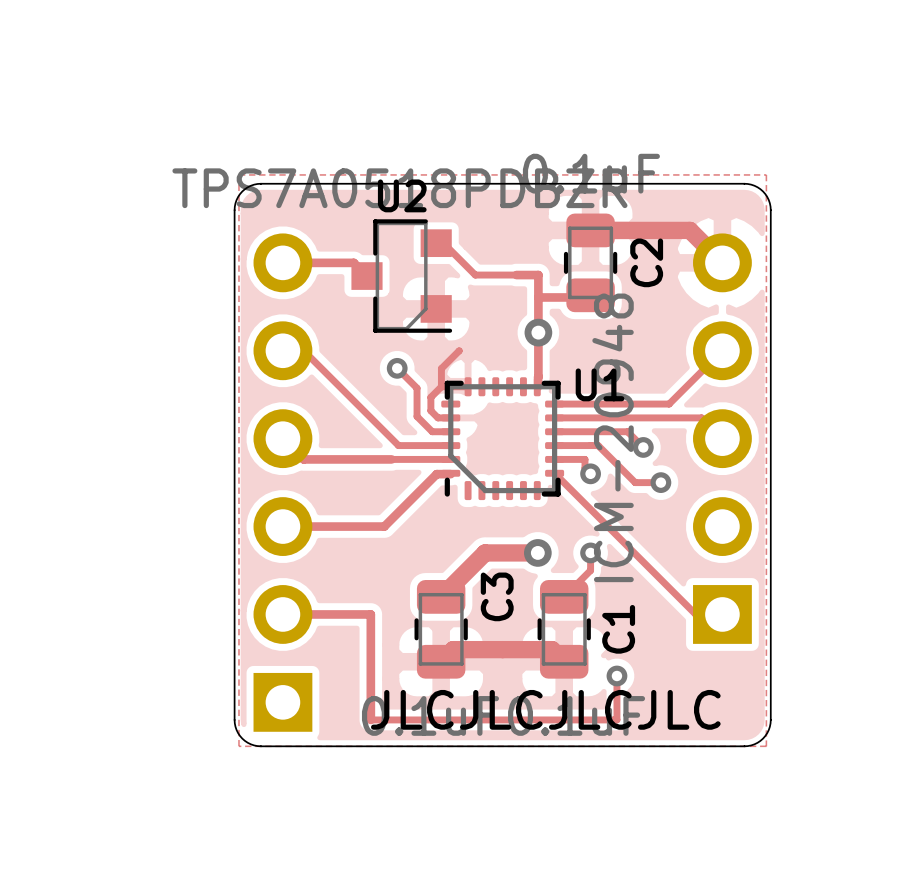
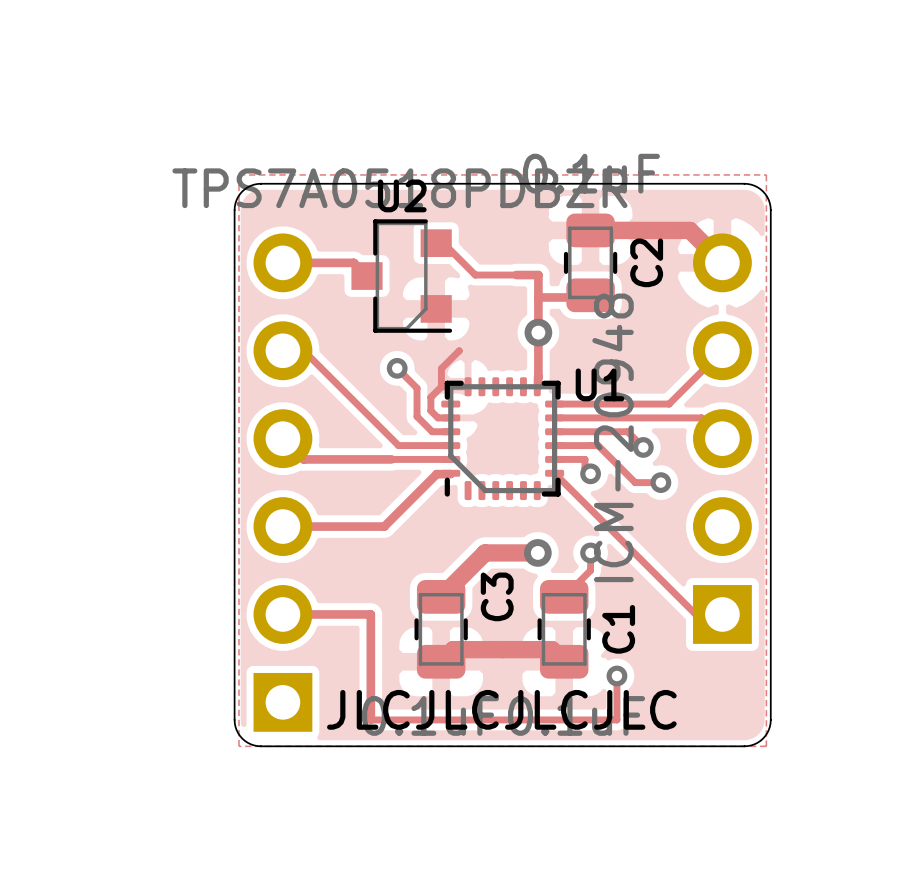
text position: JLCJLCJLCJLC (545, 709) -> JLCJLCJLCJLC (501, 709)

